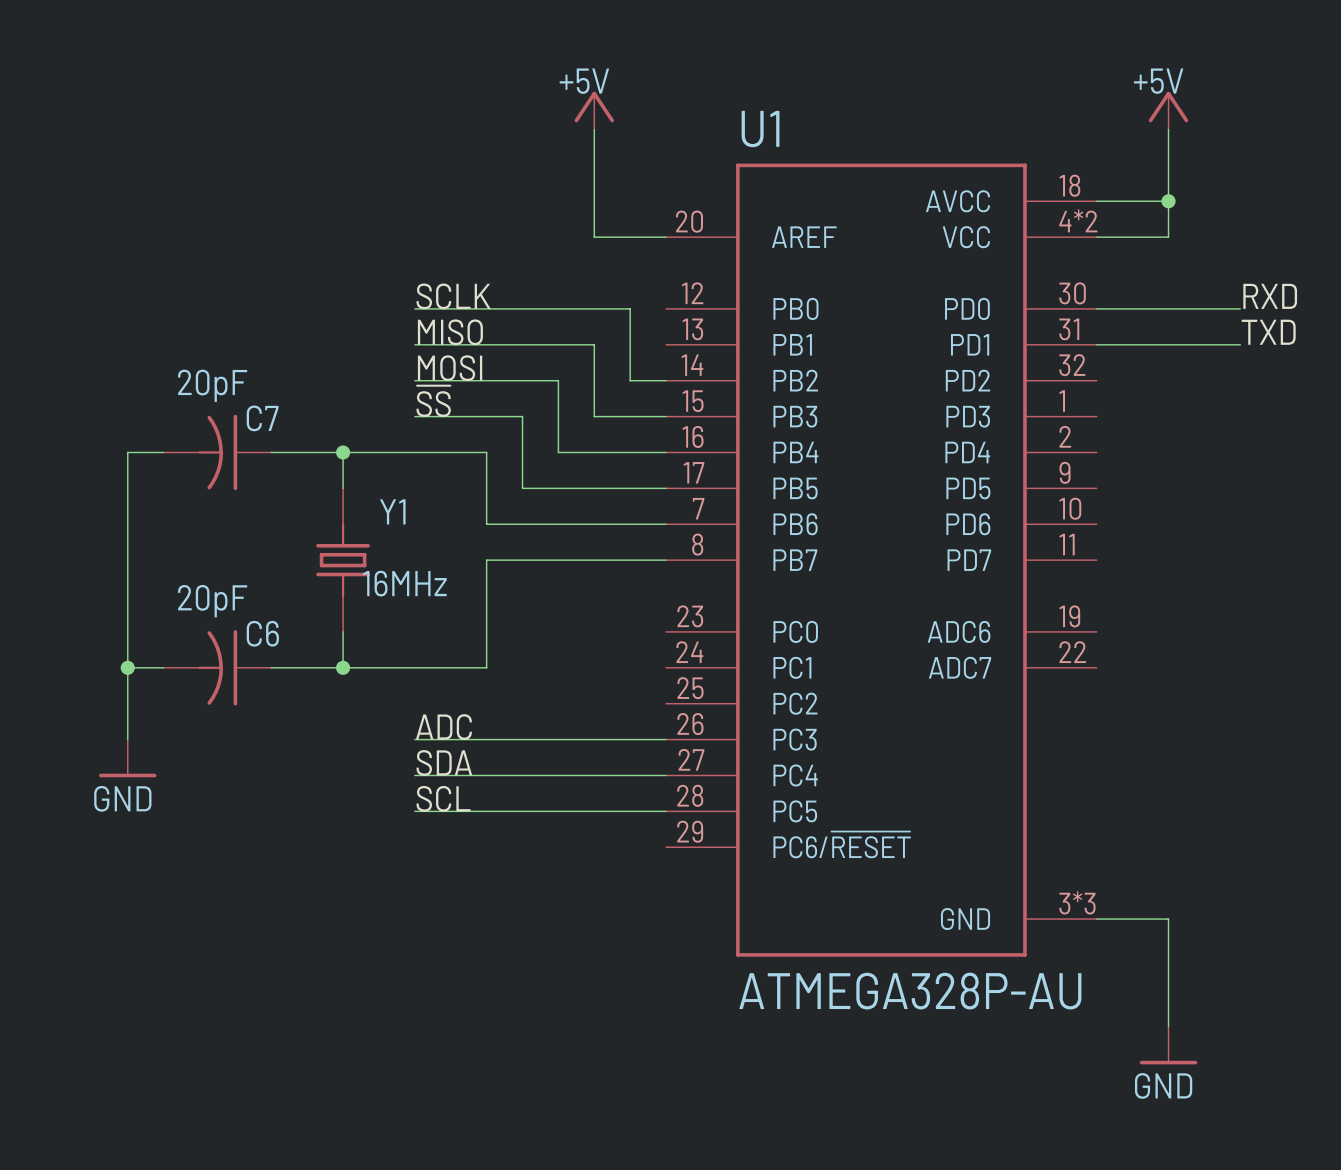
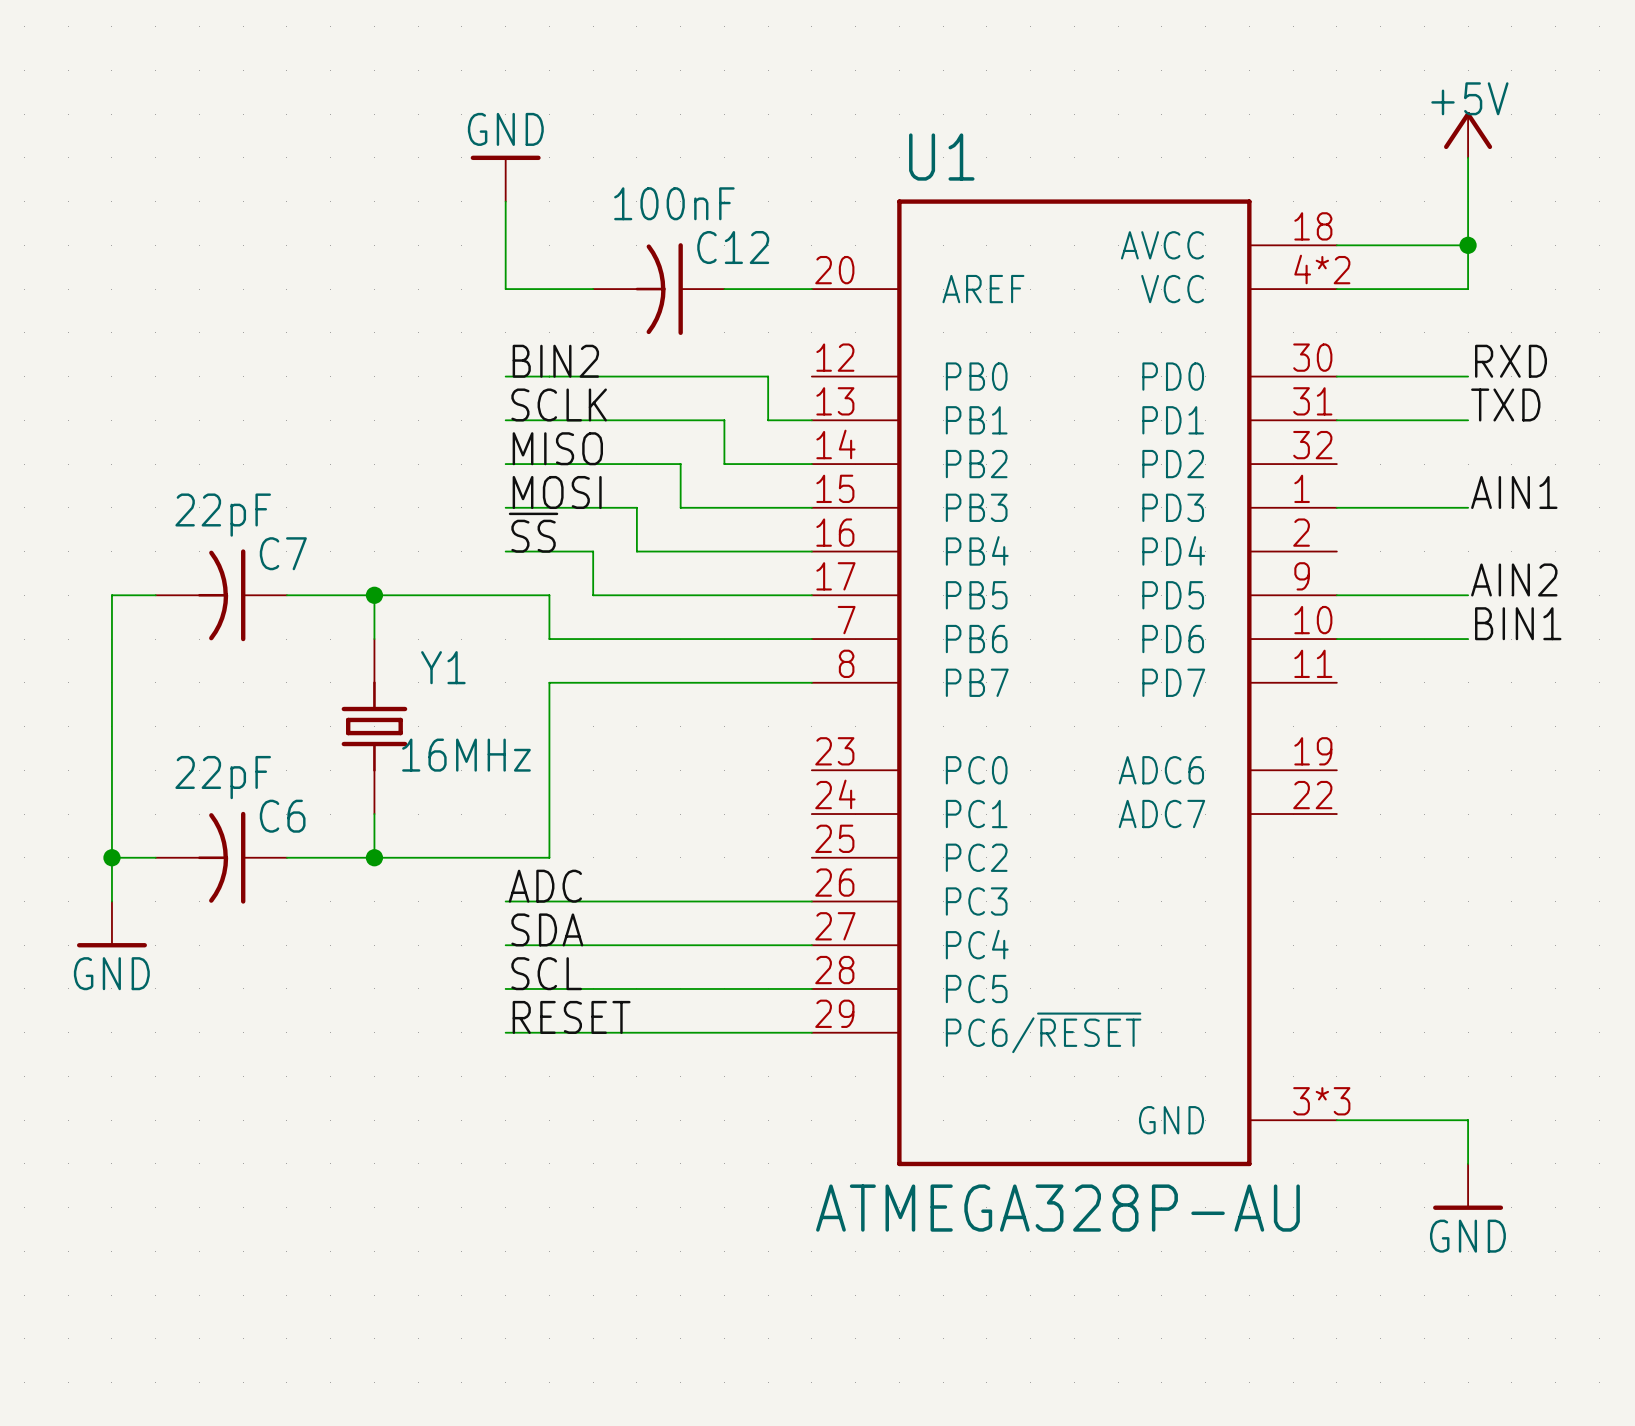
power symbol: +5V (594, 110) -> none
power symbol position: +5V (1168, 110) -> +5V (1468, 134)
wire: (594, 129) (594, 237) -> none
wire: (1168, 129) (1168, 237) -> (1468, 157) (1468, 289) (1424, 289)
power symbol: none -> GND (505, 178)
wire: none -> (505, 201) (505, 289) (593, 289)
junction position: (1168, 201) -> (1468, 245)
C12: none -> 100nF (658, 289)
label: SCLK (453, 296) -> BIN2 (555, 361)
label position: RXD (1270, 296) -> RXD (1511, 361)
wire: (1204, 308) (1240, 308) -> none
label: MISO (450, 332) -> SCLK (559, 404)
label position: TXD (1268, 332) -> TXD (1505, 404)
wire: (630, 344) (630, 380) -> (768, 420) (811, 420)
wire: (1204, 344) (1240, 344) -> (1424, 245) (1468, 245)
label: MOSI (450, 368) -> MISO (557, 448)
wire: (594, 380) (594, 416) -> (724, 464) (768, 464)
C7 value: 20pF (212, 385) -> 22pF (223, 515)
label: ~{SS} (433, 401) -> MOSI (557, 492)
label: none -> AIN1 (1514, 492)
wire: (558, 416) (558, 452) -> (636, 551) (680, 551)
wire: none -> (680, 507) (724, 507)
wire: none -> (1336, 507) (1468, 507)
label: none -> ~{SS} (533, 532)
wire: (163, 452) (127, 452) (127, 739) -> none
C7 position: (217, 452) -> (221, 595)
wire: (271, 452) (414, 452) -> none
wire: (343, 452) (343, 488) -> (374, 595) (374, 639)
junction position: (343, 452) -> (374, 595)
wire: (522, 452) (522, 488) -> none
label: none -> AIN2 (1514, 579)
wire: none -> (155, 595) (111, 595) (111, 901)
wire: none -> (286, 595) (549, 595) (549, 639) (593, 639)
wire: (486, 488) (486, 524) -> (593, 595) (636, 595)
wire: none -> (1336, 595) (1468, 595)
label: none -> BIN1 (1518, 623)
wire: none -> (1336, 639) (1468, 639)
Y1 position: (343, 560) -> (374, 726)
wire: (486, 560) (486, 667) (271, 667) -> (593, 682) (549, 682) (549, 857) (286, 857)
C6 value: 20pF (212, 601) -> 22pF (223, 777)
wire: (343, 631) (343, 667) -> (374, 814) (374, 857)
wire: (127, 667) (163, 667) -> (111, 857) (155, 857)
junction position: (127, 667) -> (111, 857)
C6 position: (217, 667) -> (221, 857)
junction position: (343, 667) -> (374, 857)
power symbol position: GND (127, 758) -> GND (111, 924)
label: none -> RESET (571, 1017)
wire: none -> (505, 1032) (811, 1032)
wire: (1168, 919) (1168, 1026) -> (1424, 1120) (1468, 1120) (1468, 1163)
U1 value position: ATMEGA328P-AU (910, 991) -> ATMEGA328P-AU (1057, 1208)
power symbol position: GND (1168, 1045) -> GND (1468, 1186)

